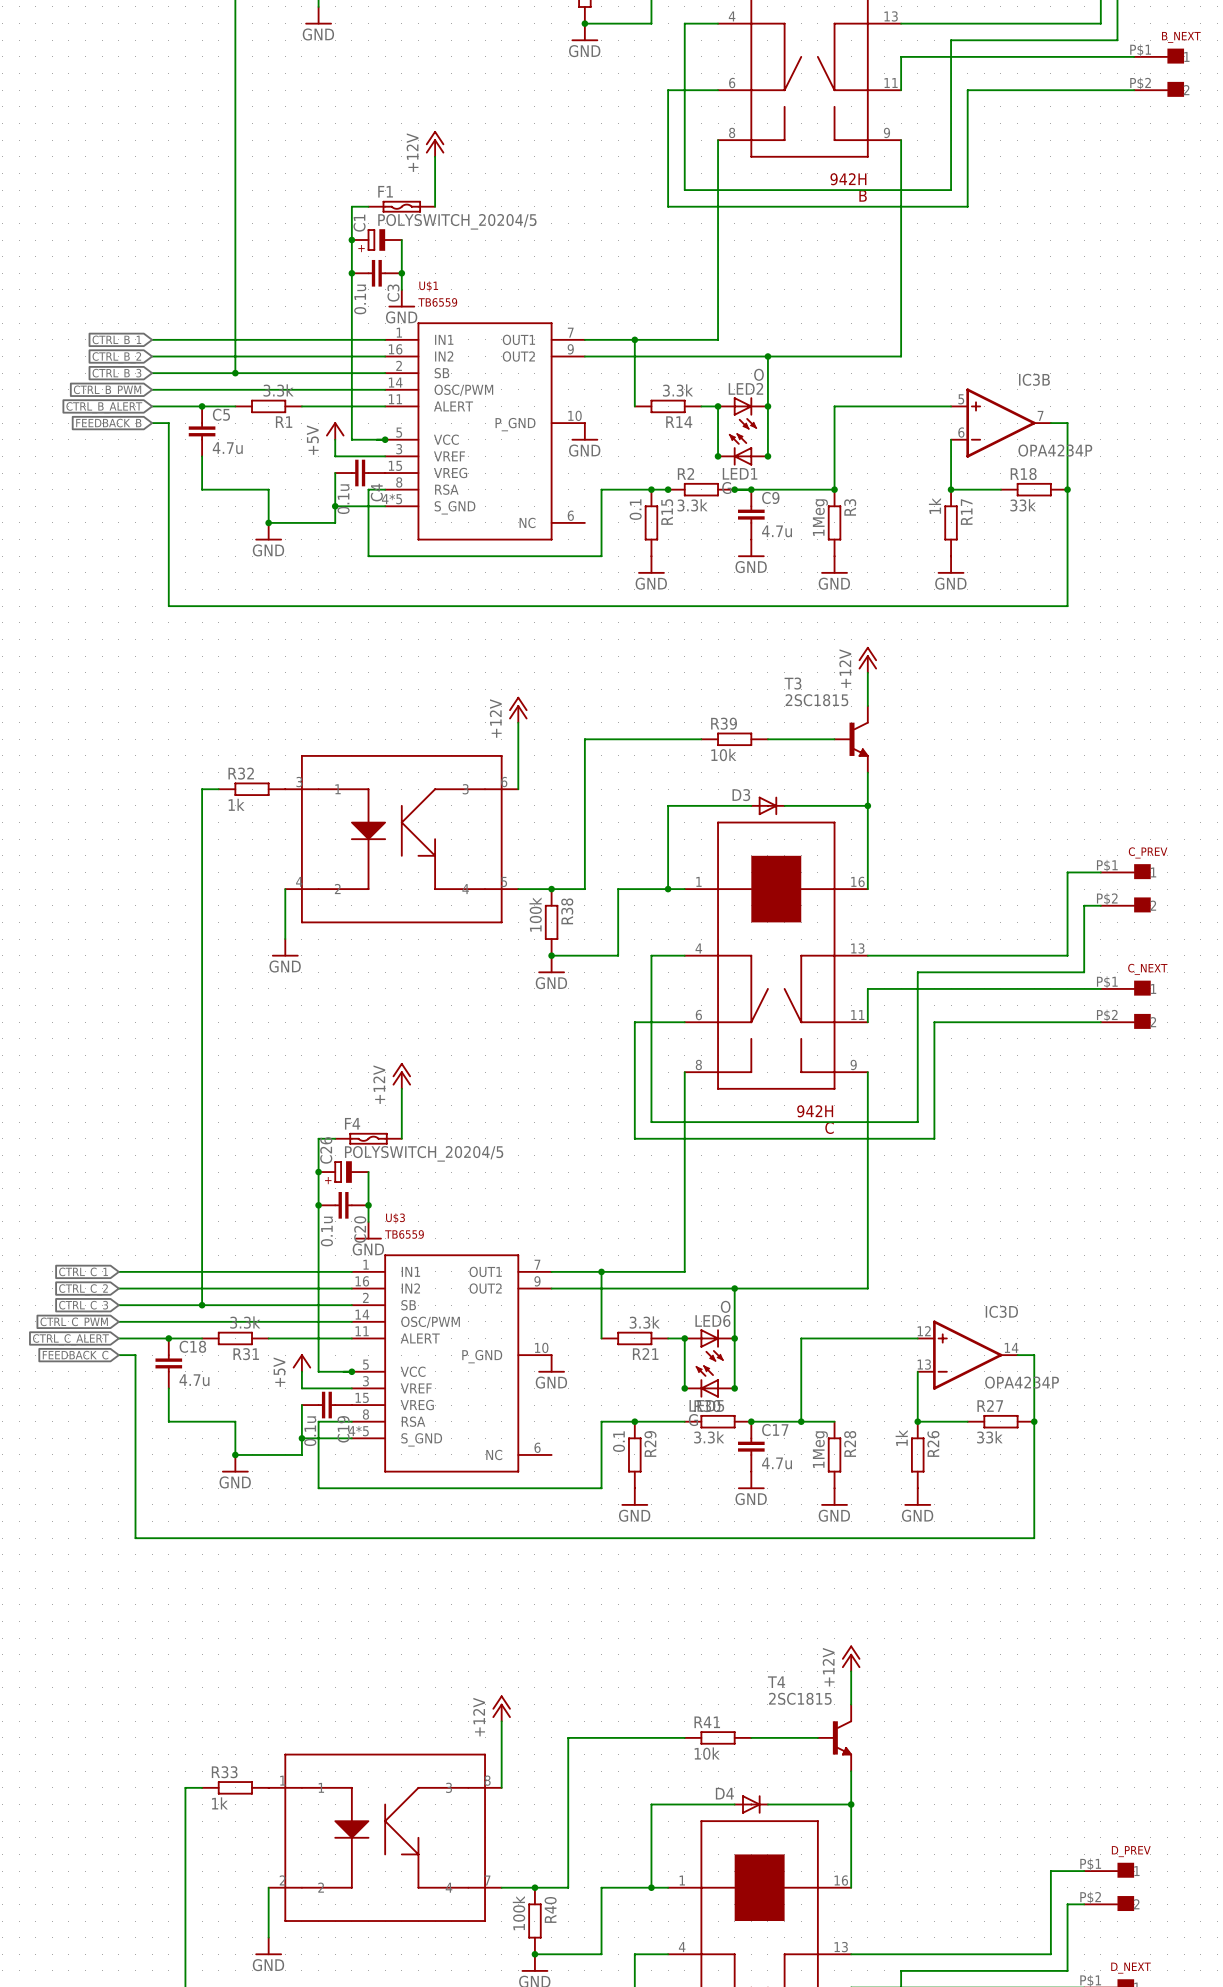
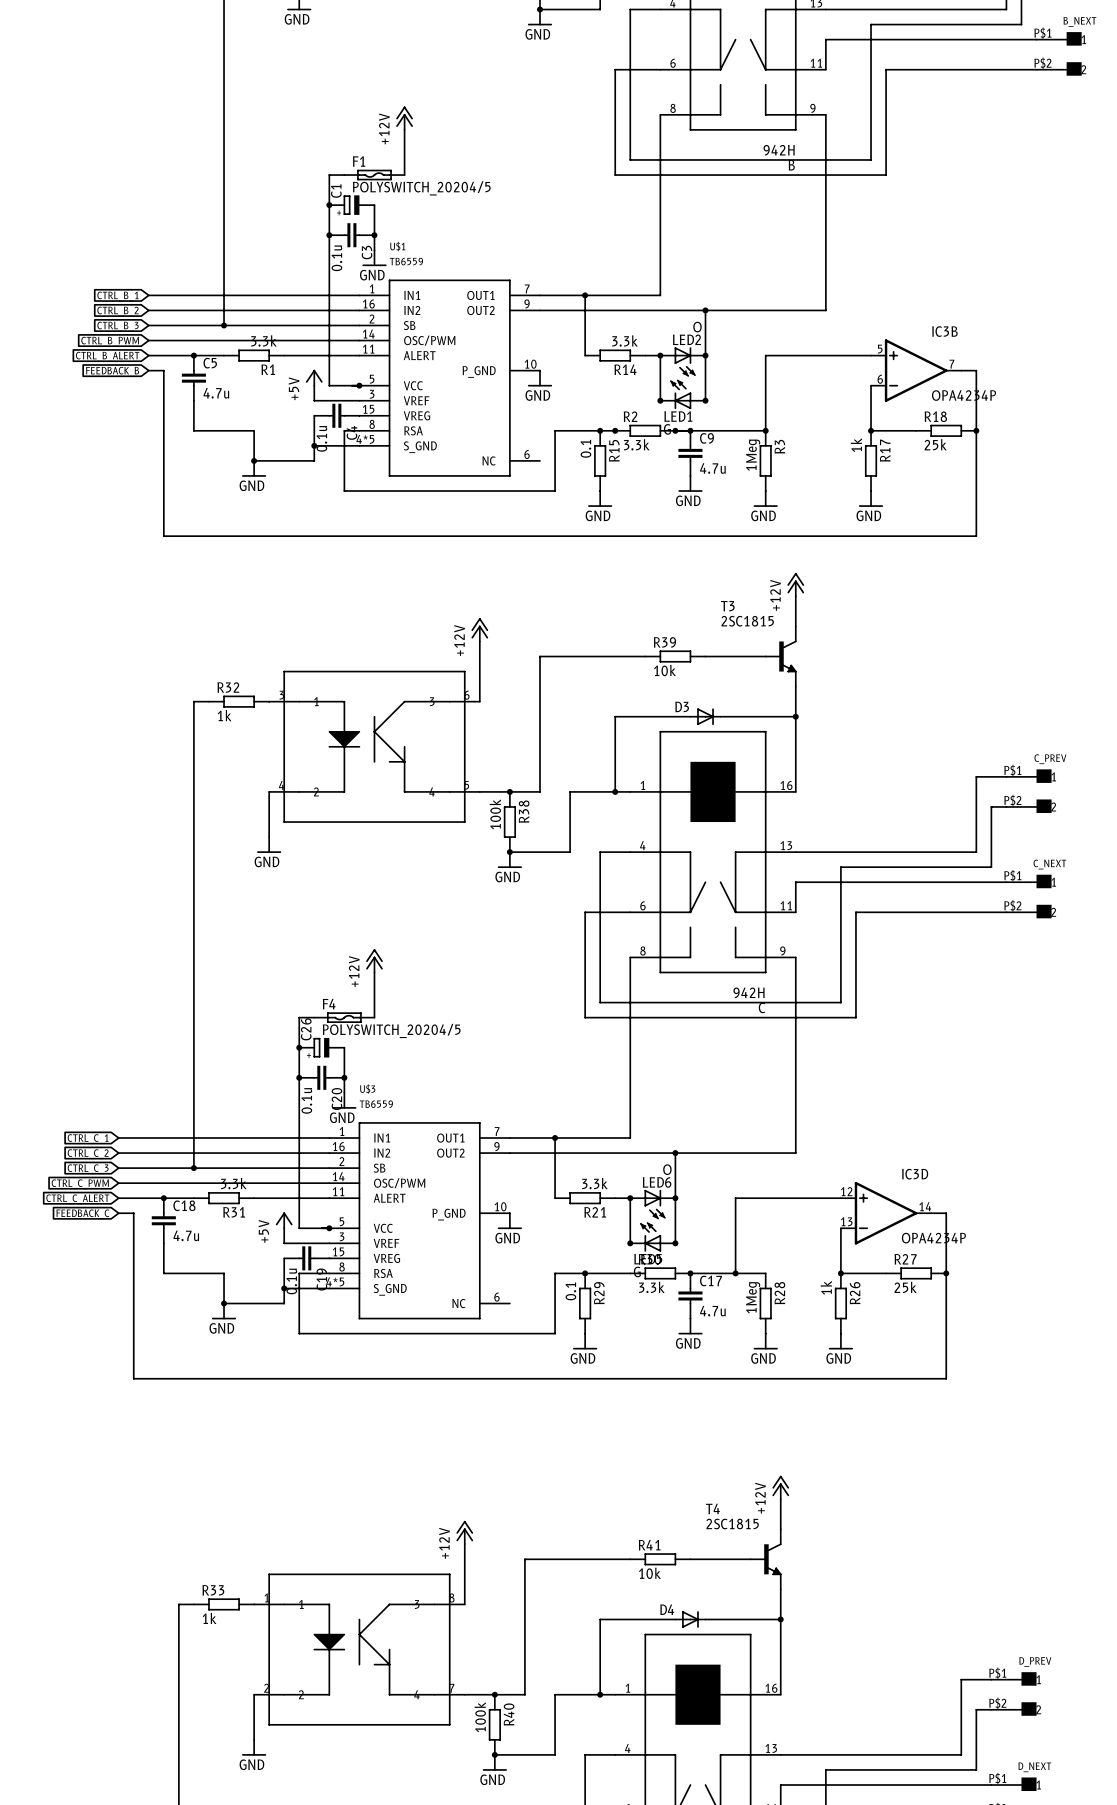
R18 value: 33k (1023, 505) -> 25k (935, 444)
R27 value: 33k (989, 1437) -> 25k (905, 1287)

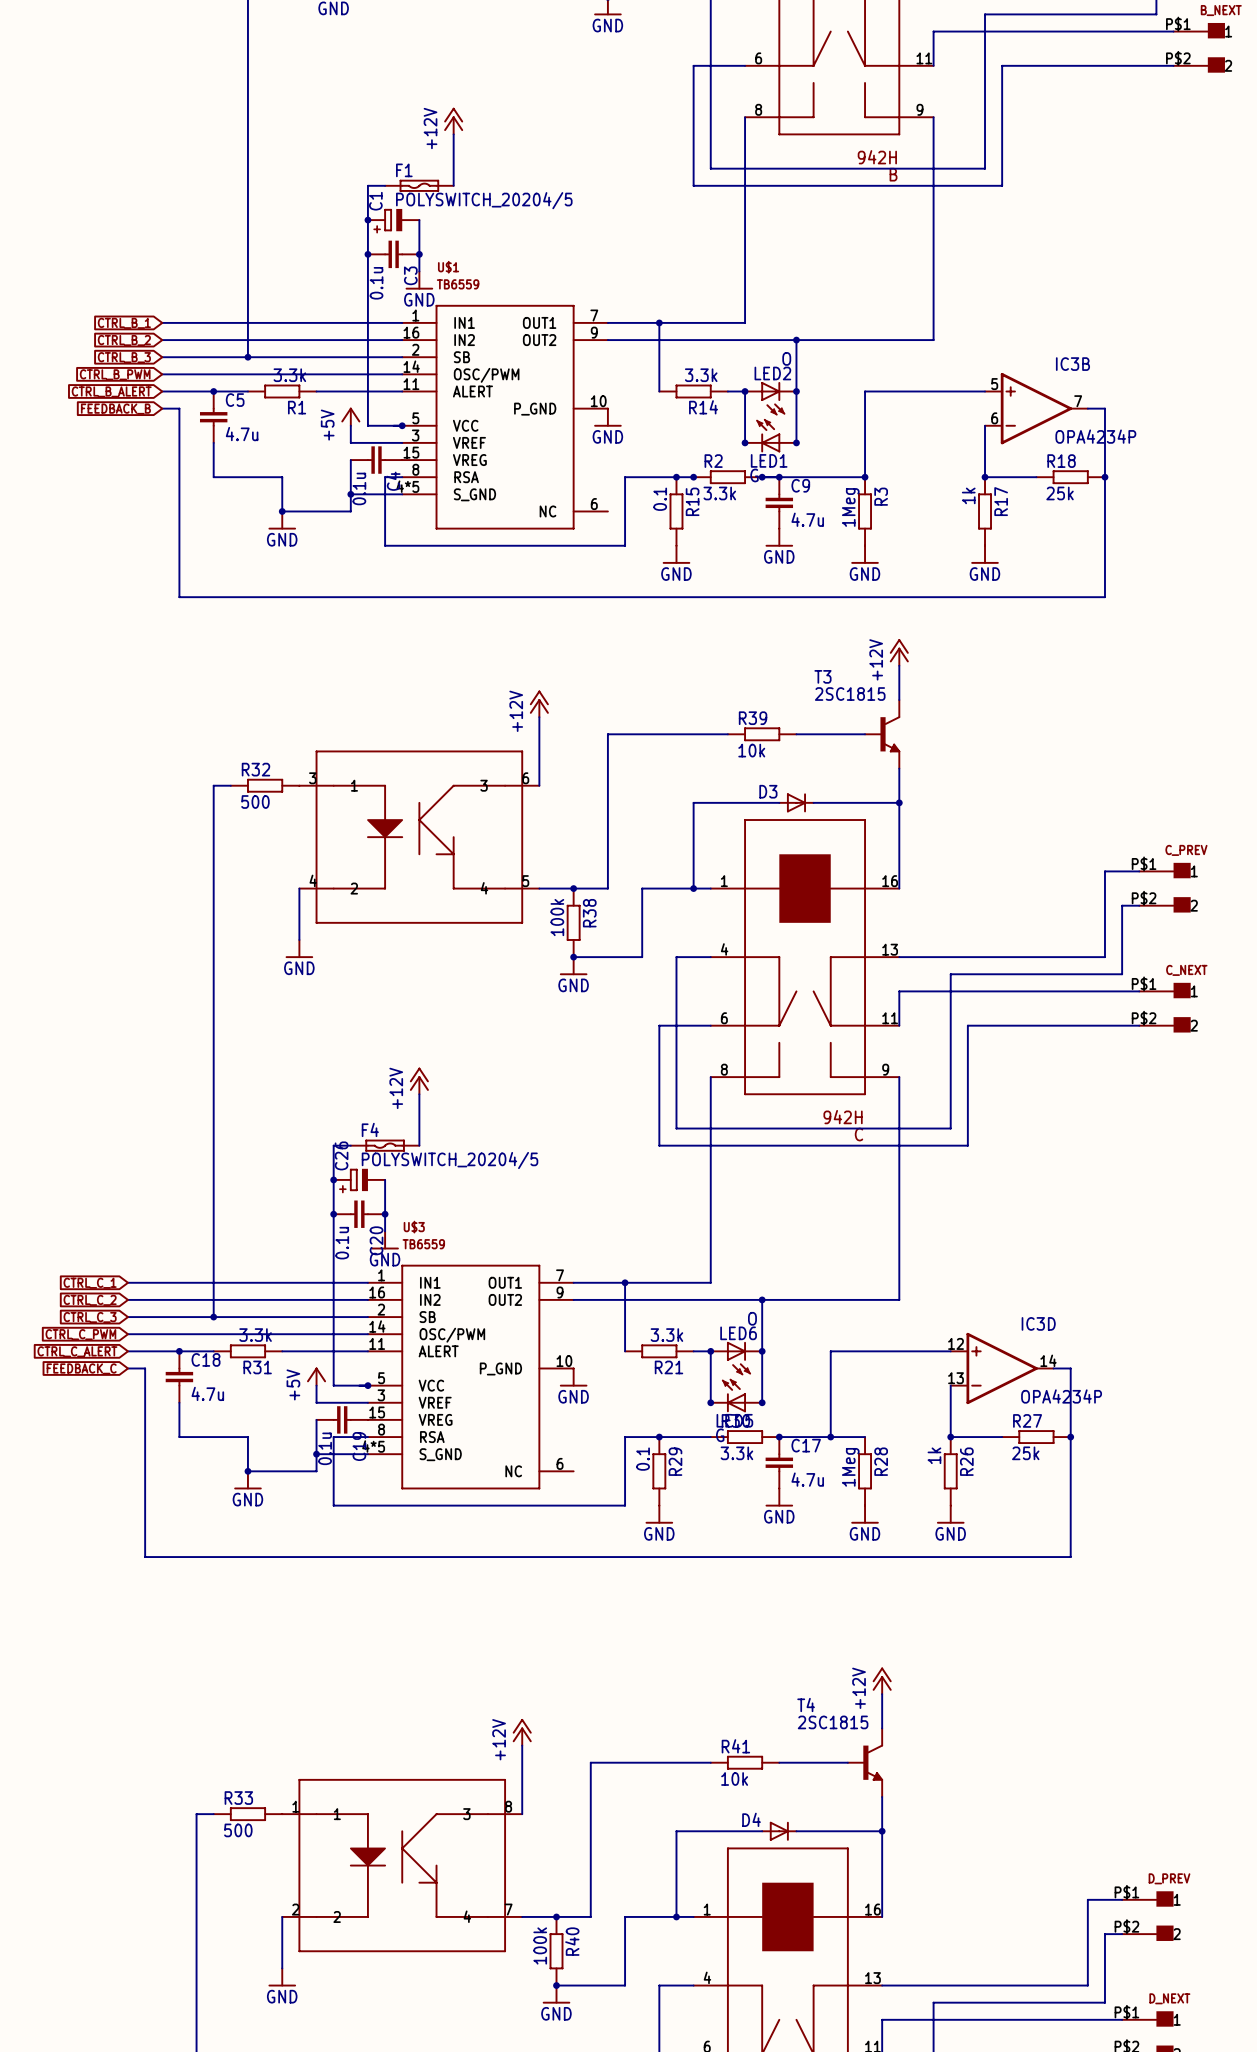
R32 value: 1k (224, 715) -> 500 (255, 802)
R33 value: 1k (209, 1618) -> 500 (238, 1830)

